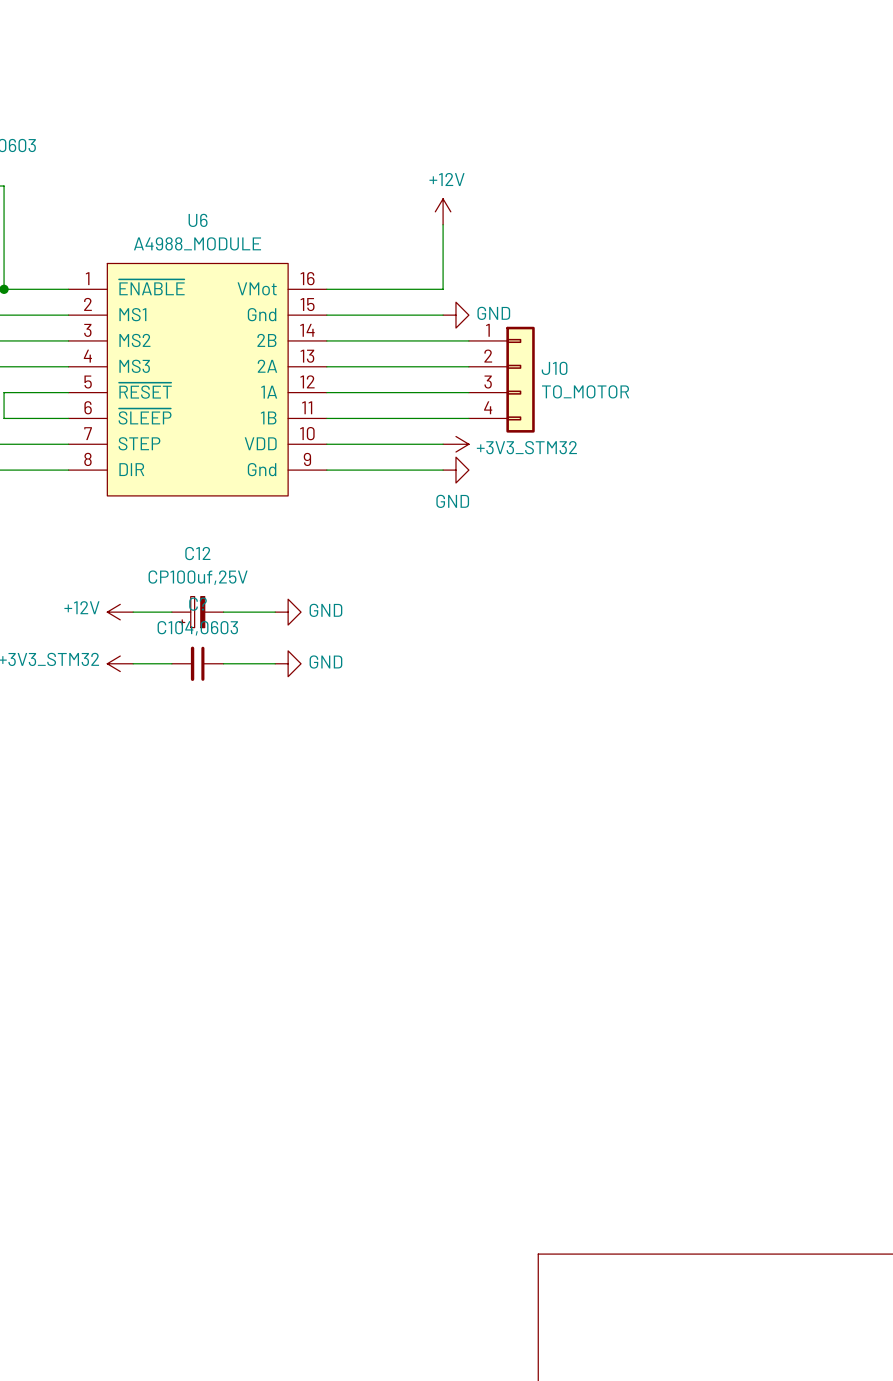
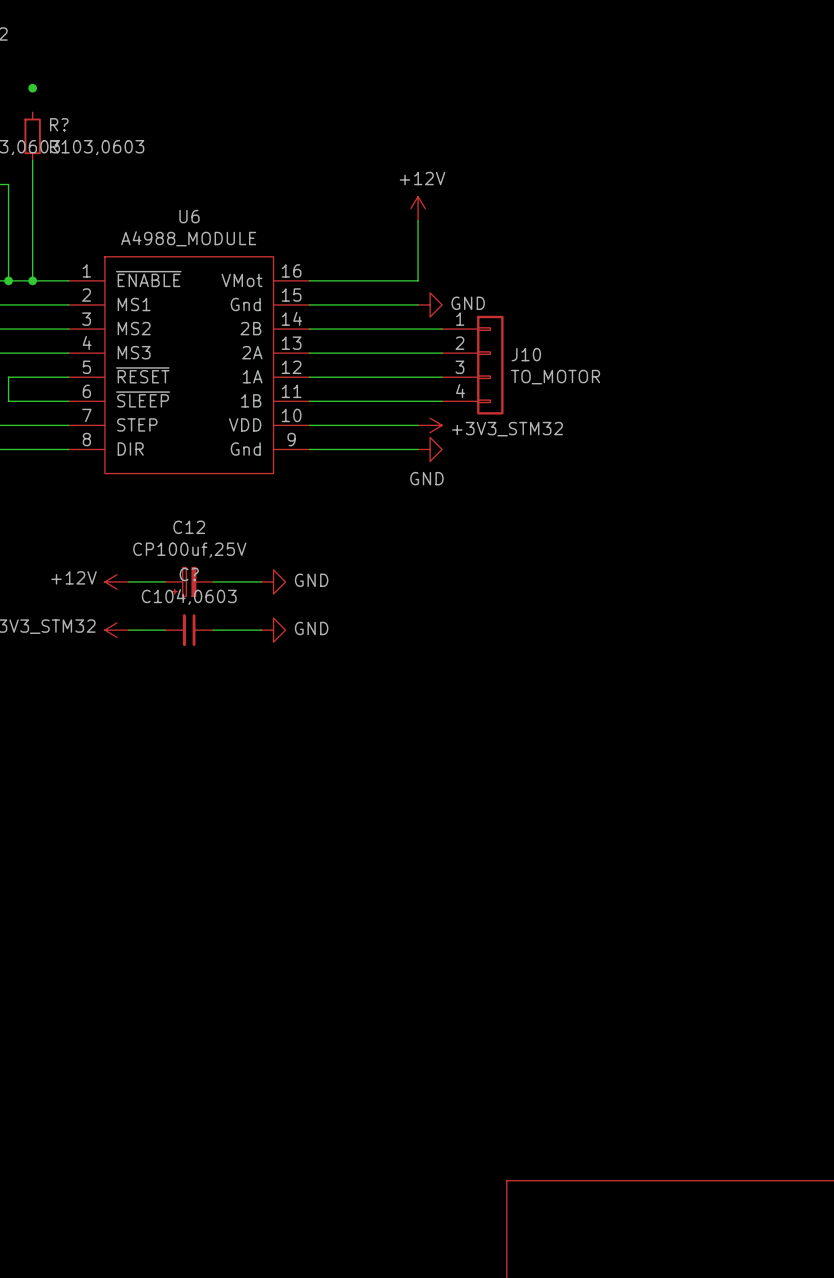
junction: none -> (32, 88)
R?: none -> R103,0603 (32, 136)
wire: none -> (32, 160) (32, 280)
junction: none -> (32, 280)

